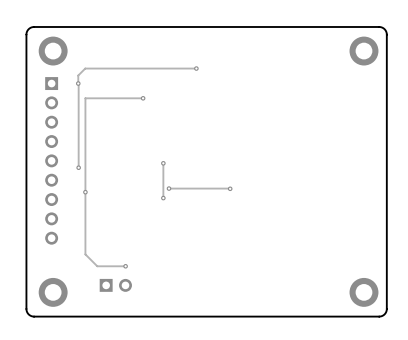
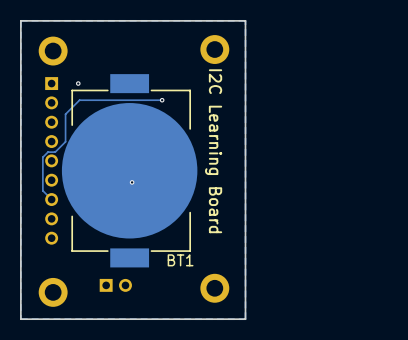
board edge: (379, 26) (34, 26) (29, 28) (26, 34) (26, 308) (28, 313) (34, 316) (379, 316) (383, 314) (386, 308) (386, 34) (384, 29) (379, 26) -> (245, 20) (245, 319) (20, 319) (20, 20) (245, 20)
part: none -> (214, 49)
part: (363, 51) -> none
track: (196, 68) (85, 68) (78, 75) (78, 167) -> none
via: (196, 68) -> none
track: (143, 98) (85, 98) (85, 254) (97, 266) (125, 266) -> none
via position: (143, 98) -> (162, 100)
track: none -> (162, 100) (79, 100) (65, 114) (65, 141) (55, 152) (48, 152) (42, 157) (42, 190) (51, 199)
text: none -> I2C Learning Board (213, 151)
track: (163, 163) (163, 198) -> none
via: (163, 163) -> none
via: (78, 167) -> none
BT1: none -> (129, 170)
via: none -> (132, 182)
track: (168, 188) (230, 188) -> none
via: (168, 188) -> none
via: (230, 188) -> none
via: (85, 192) -> none
via: (163, 198) -> none
via: (125, 266) -> none
part: none -> (214, 288)
part: (363, 292) -> none

